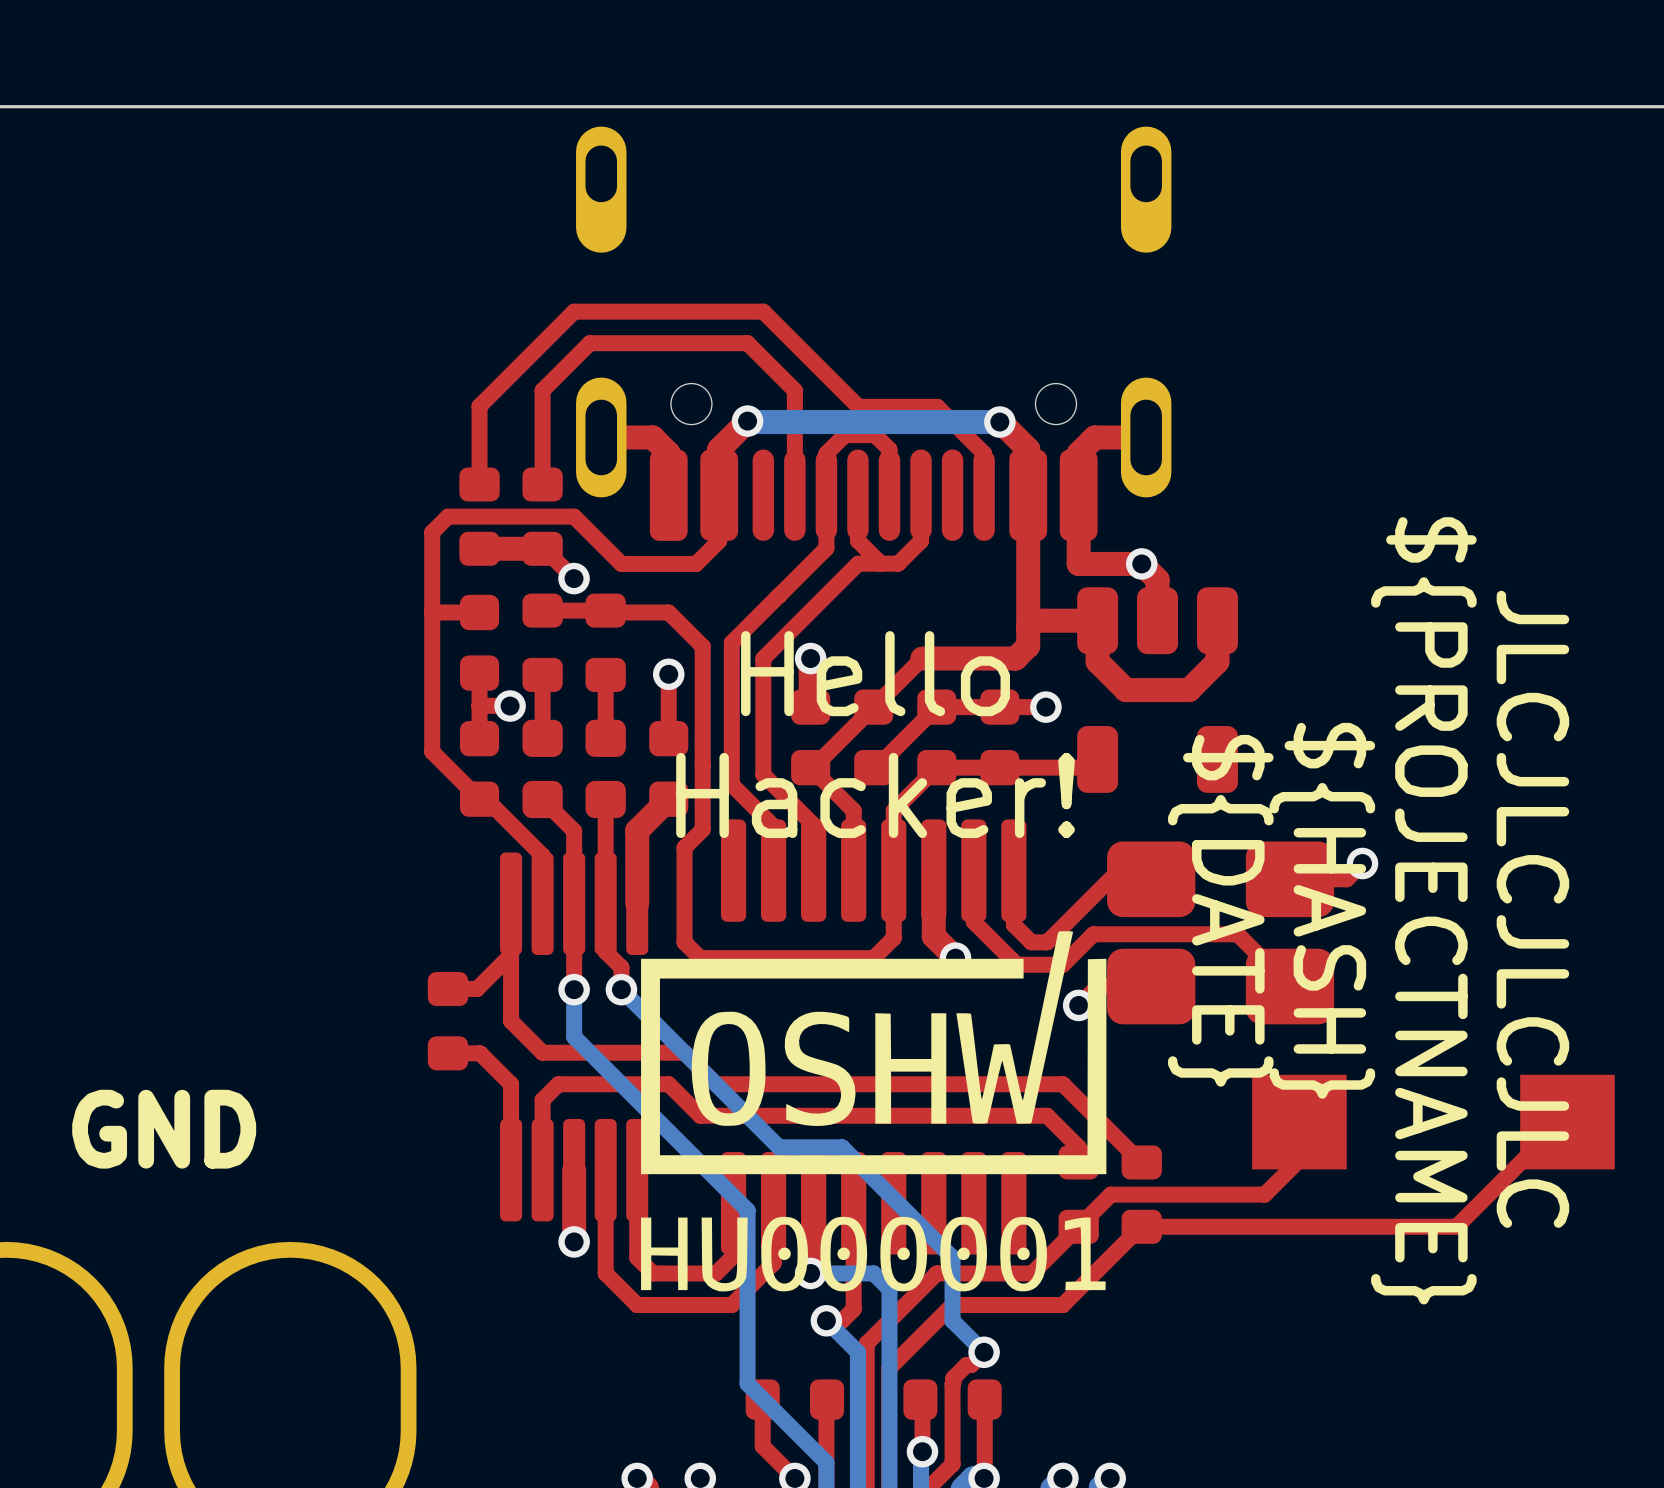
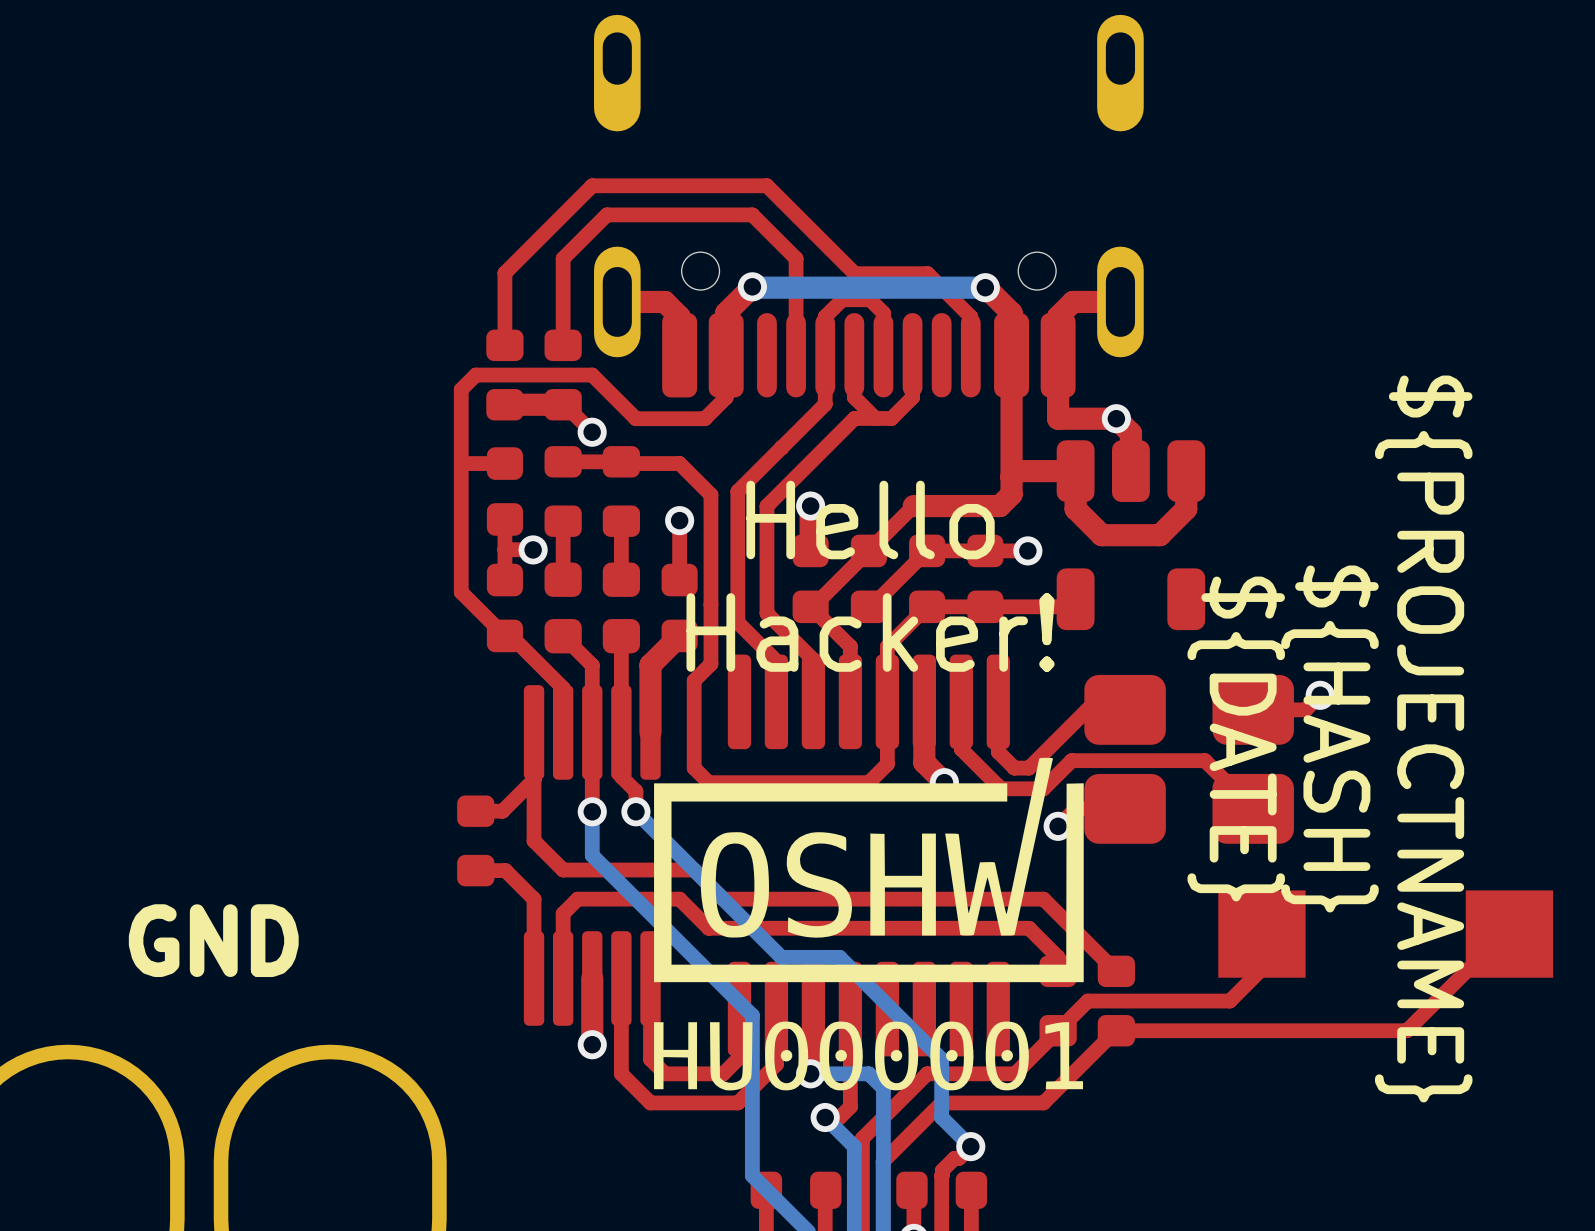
text: JLCJLCJLCJLC (1532, 909) -> none
text position: ${DATE} (1220, 910) -> ${DATE} (1236, 738)
text position: ${HASH} (1322, 910) -> ${HASH} (1329, 738)
text position: ${PROJECTNAME} (1423, 910) -> ${PROJECTNAME} (1423, 738)

